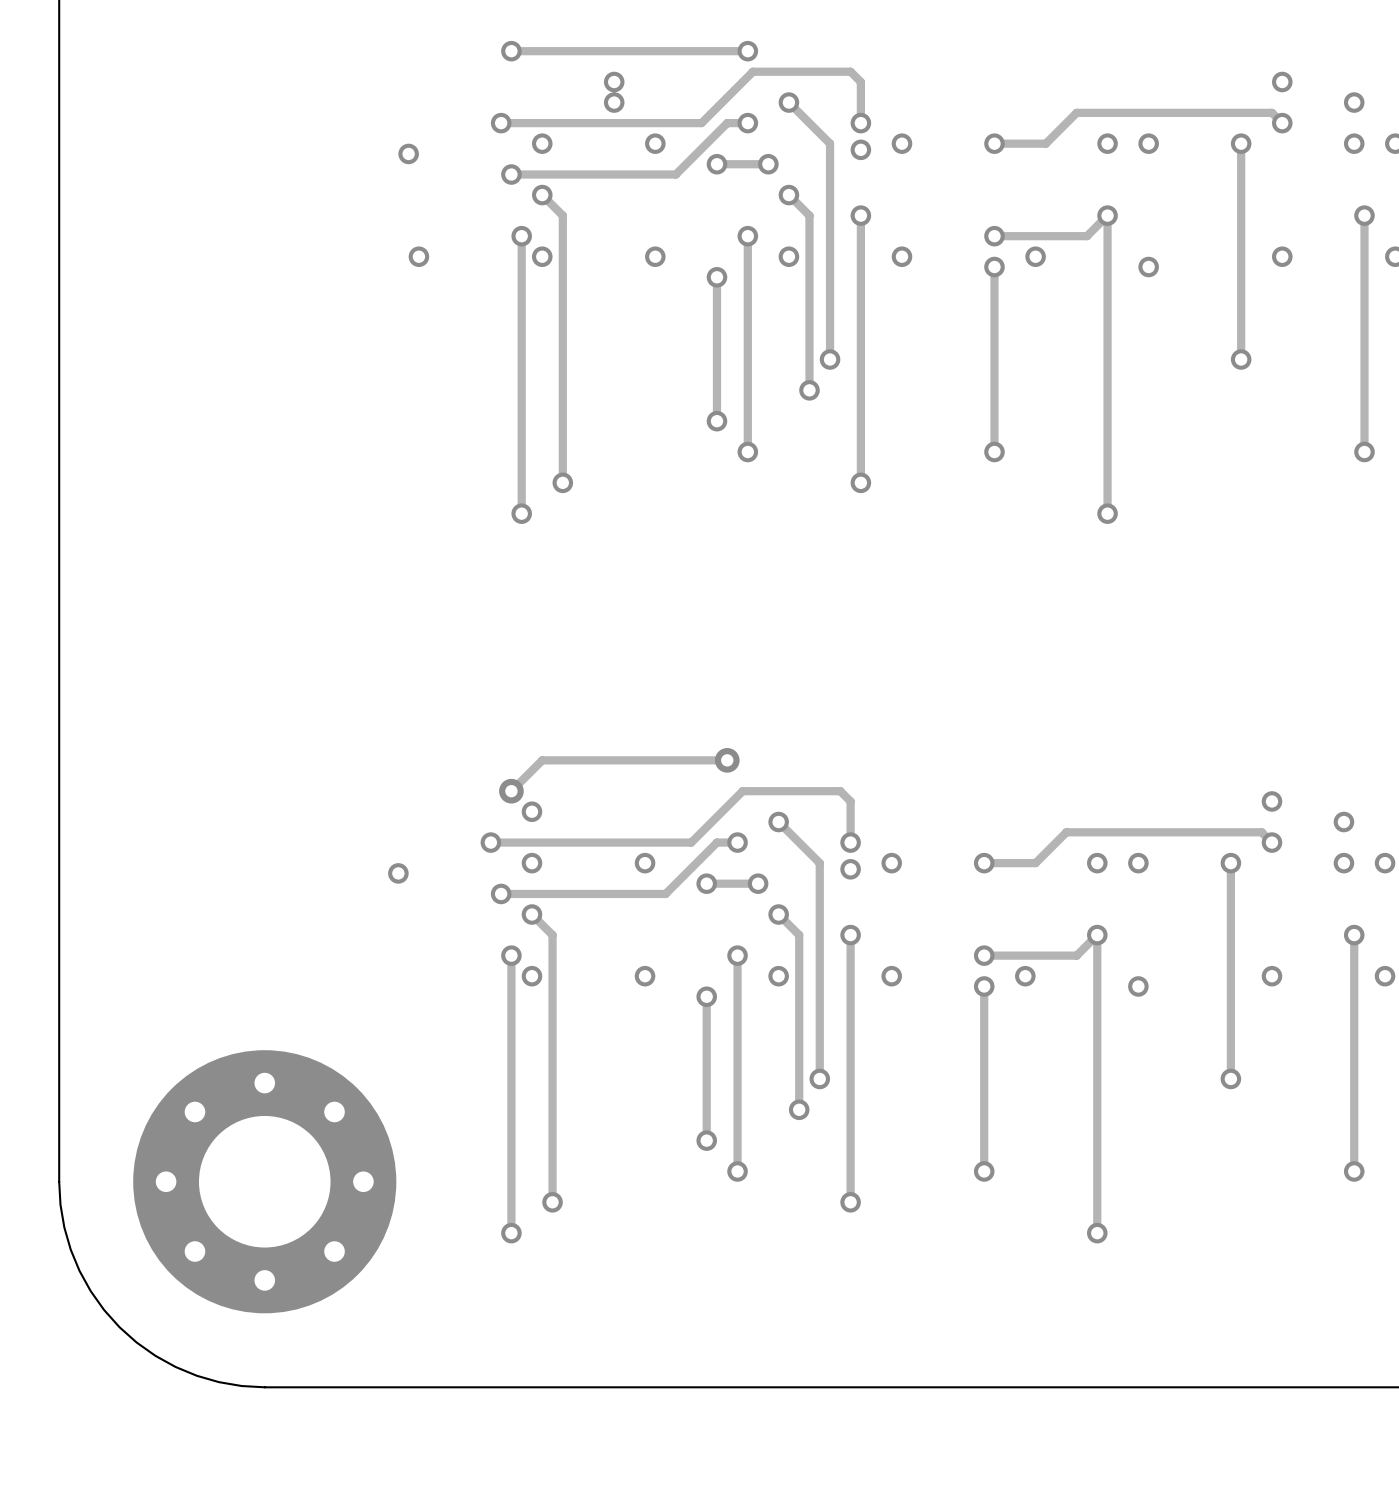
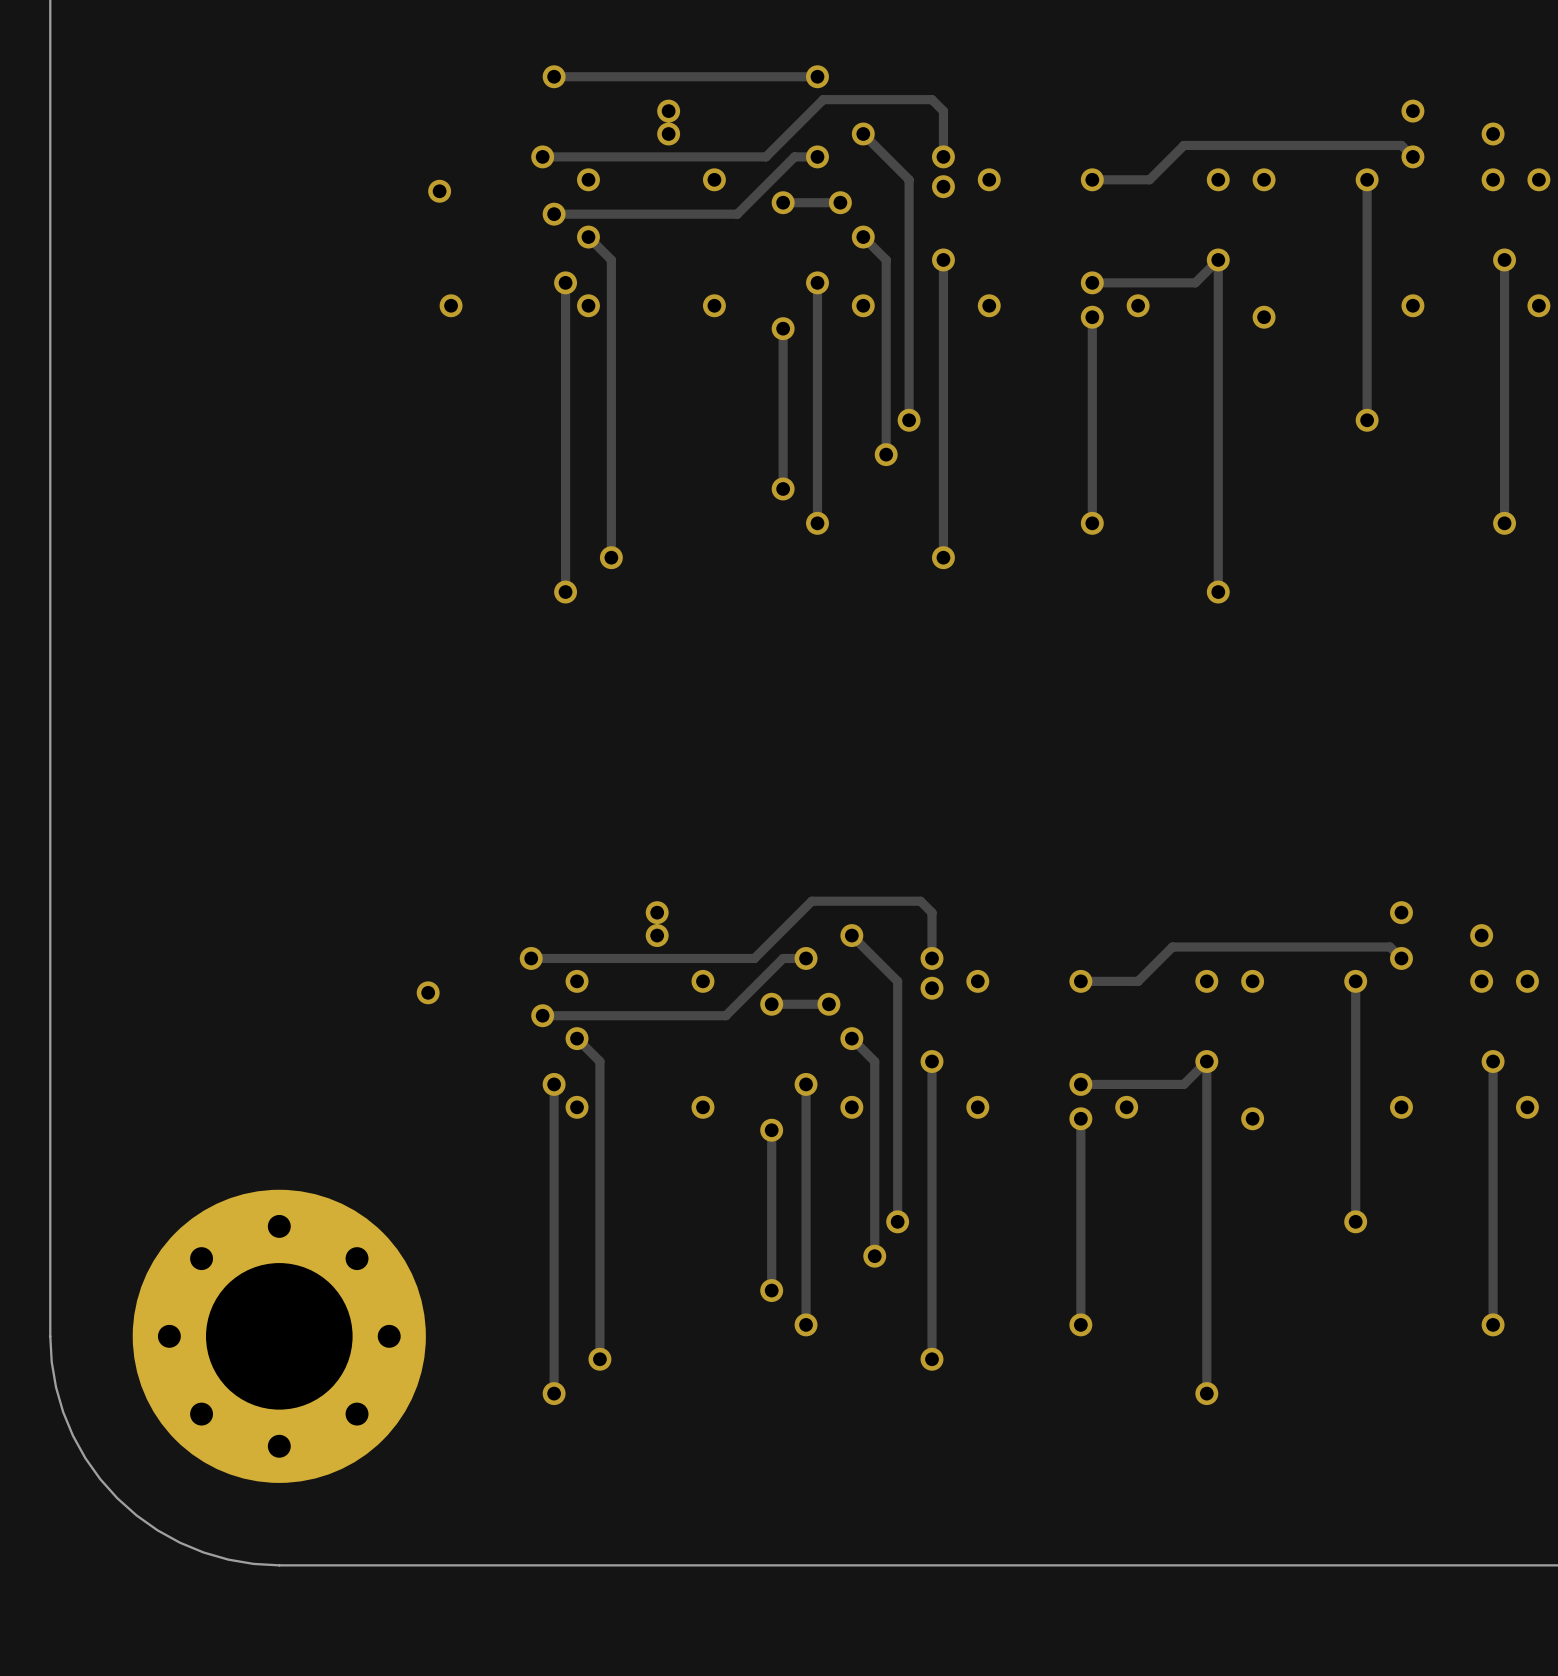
track: (727, 760) (542, 760) (511, 791) -> none
via: (727, 760) -> none
via: (511, 791) -> none
via: none -> (657, 912)
via: (531, 811) -> none
via: none -> (657, 935)

